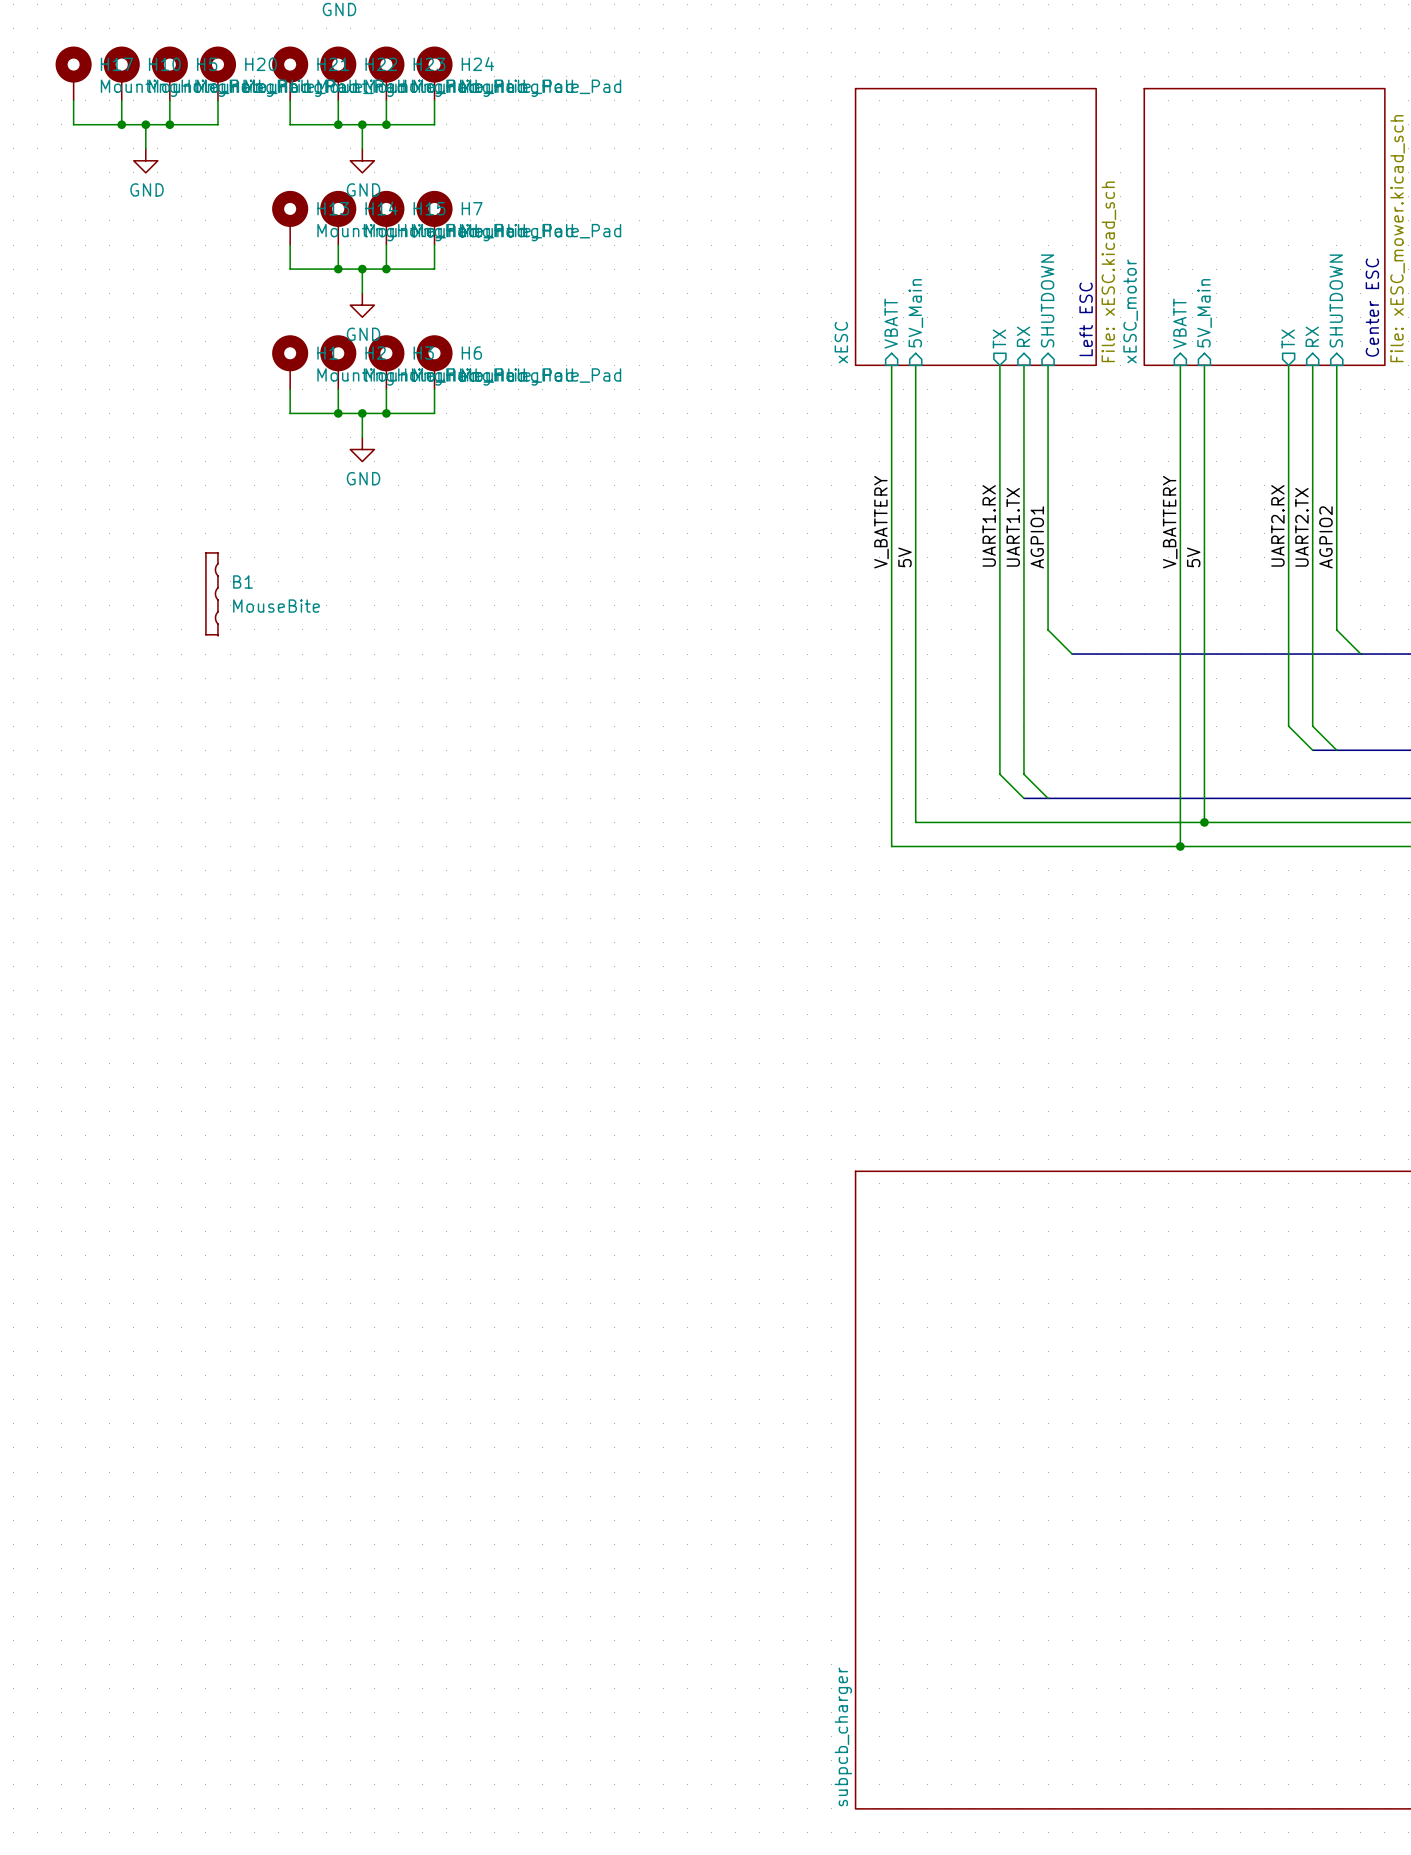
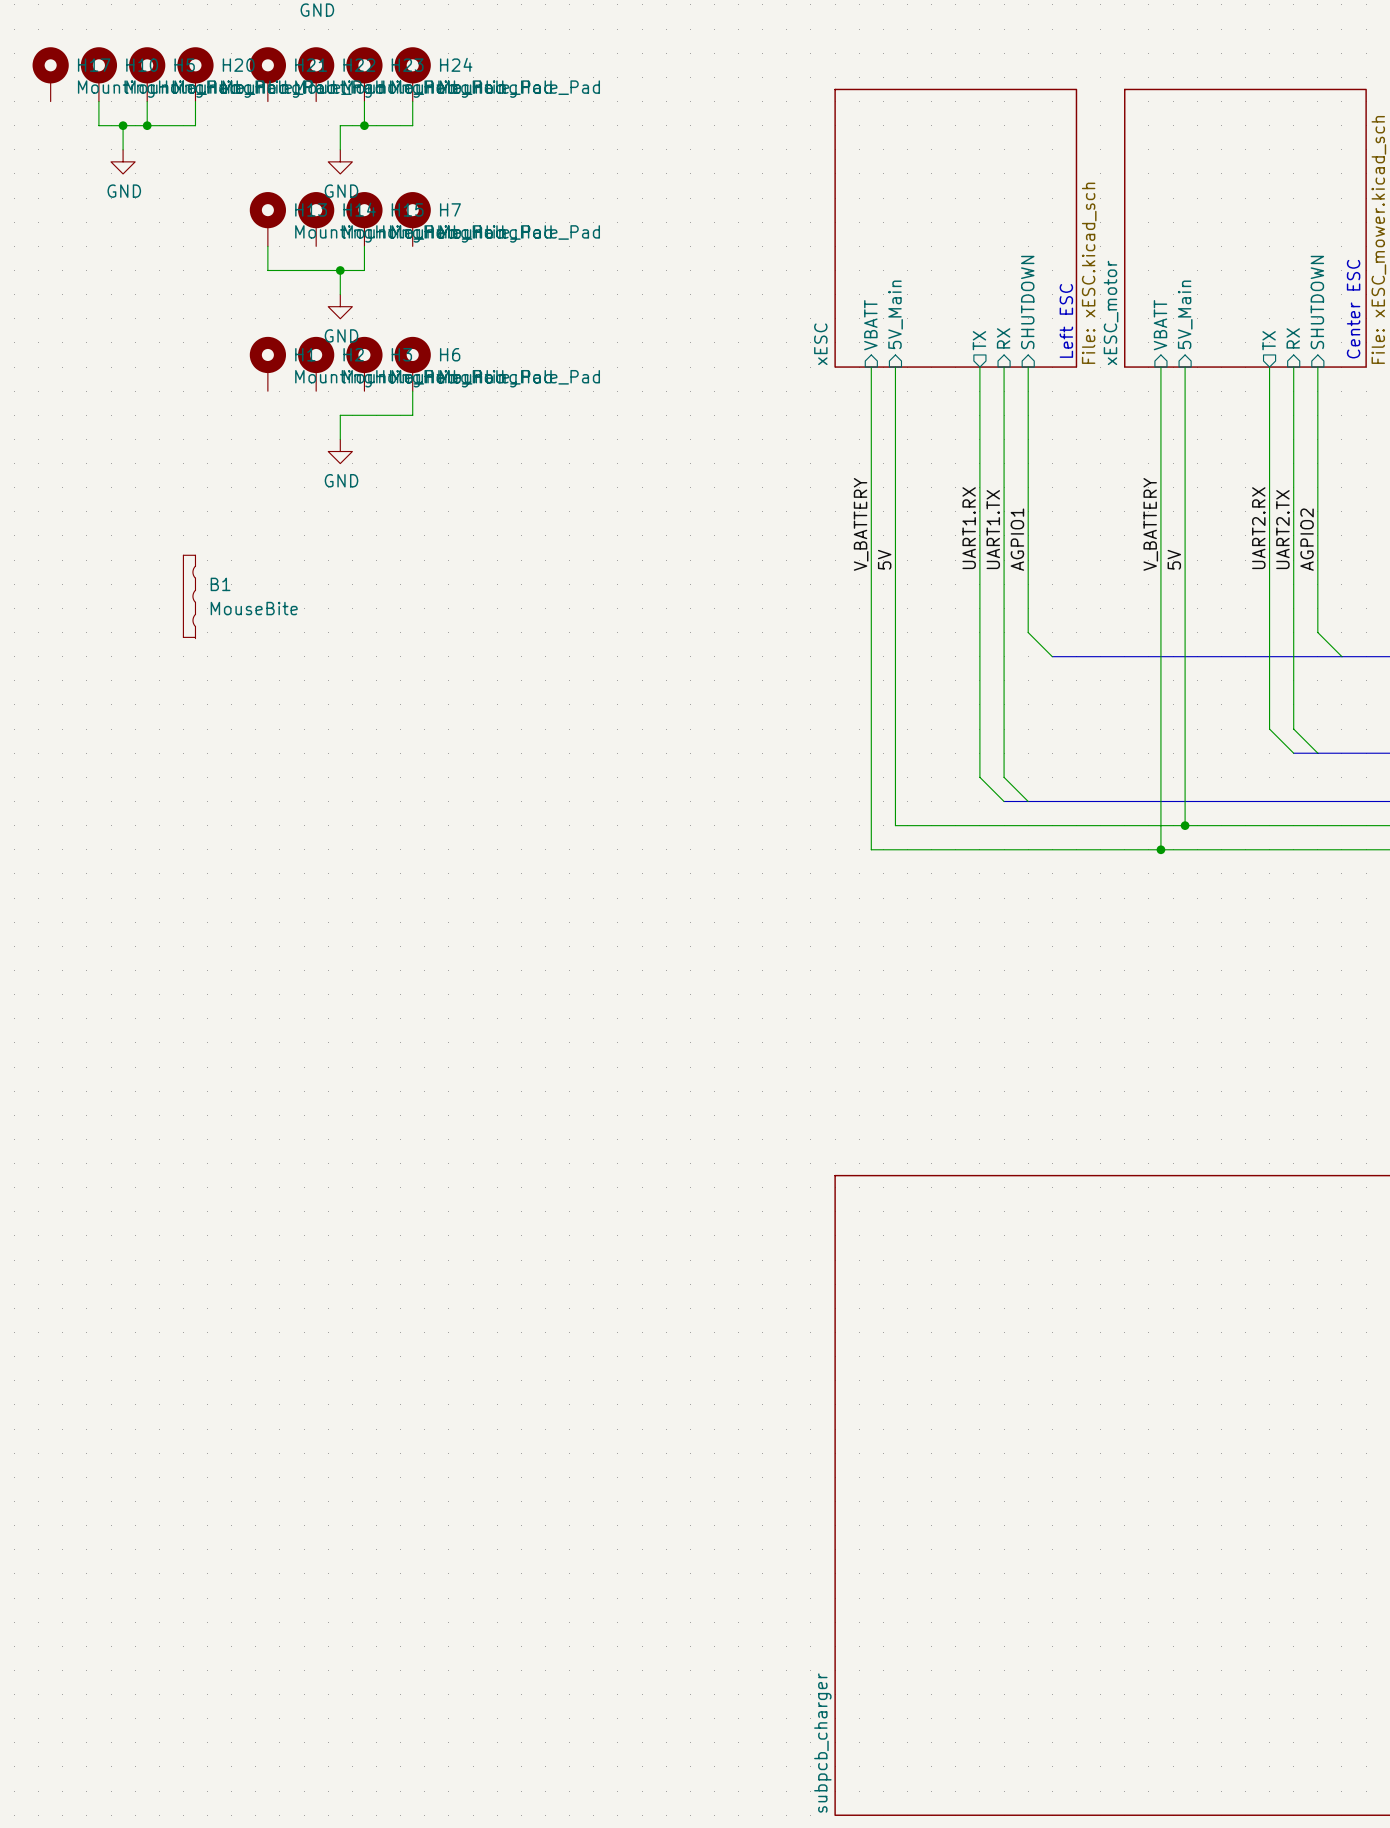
wire: (73, 100) (73, 124) (121, 124) -> none
wire: (290, 100) (290, 124) (362, 124) -> none
wire: (338, 100) (338, 124) -> none
junction: (121, 124) -> none
junction: (338, 124) -> none
junction: (362, 124) -> none
wire: (338, 245) (338, 269) -> none
wire: (434, 245) (434, 269) (386, 269) -> none
junction: (338, 269) -> none
junction: (386, 269) -> none
wire: (290, 389) (290, 413) (362, 413) -> none
wire: (338, 389) (338, 413) -> none
wire: (386, 389) (386, 413) -> none
junction: (338, 413) -> none
junction: (362, 413) -> none
junction: (386, 413) -> none

